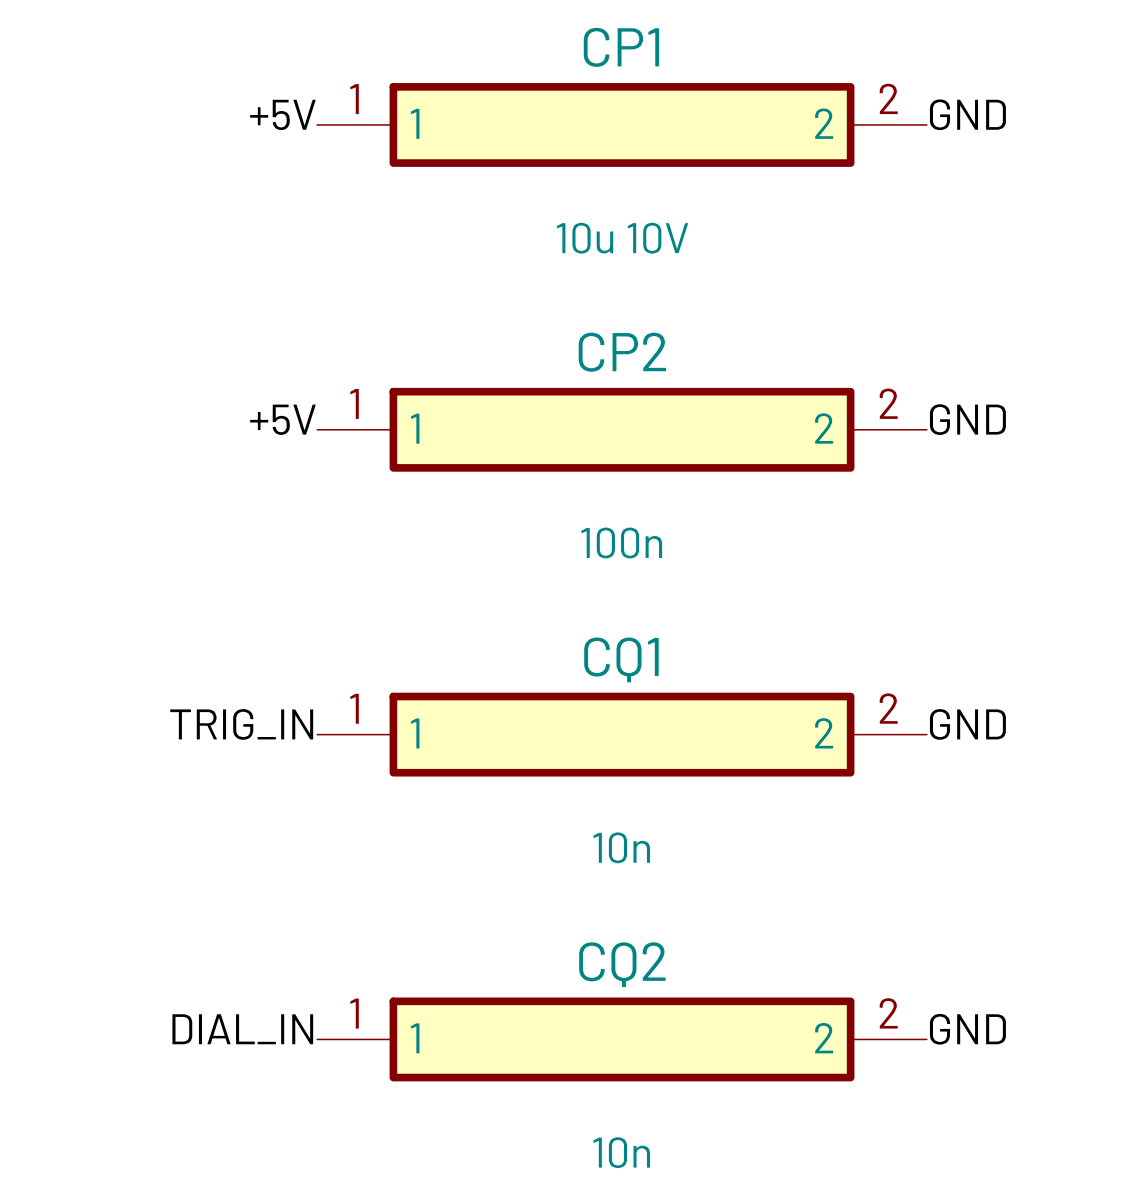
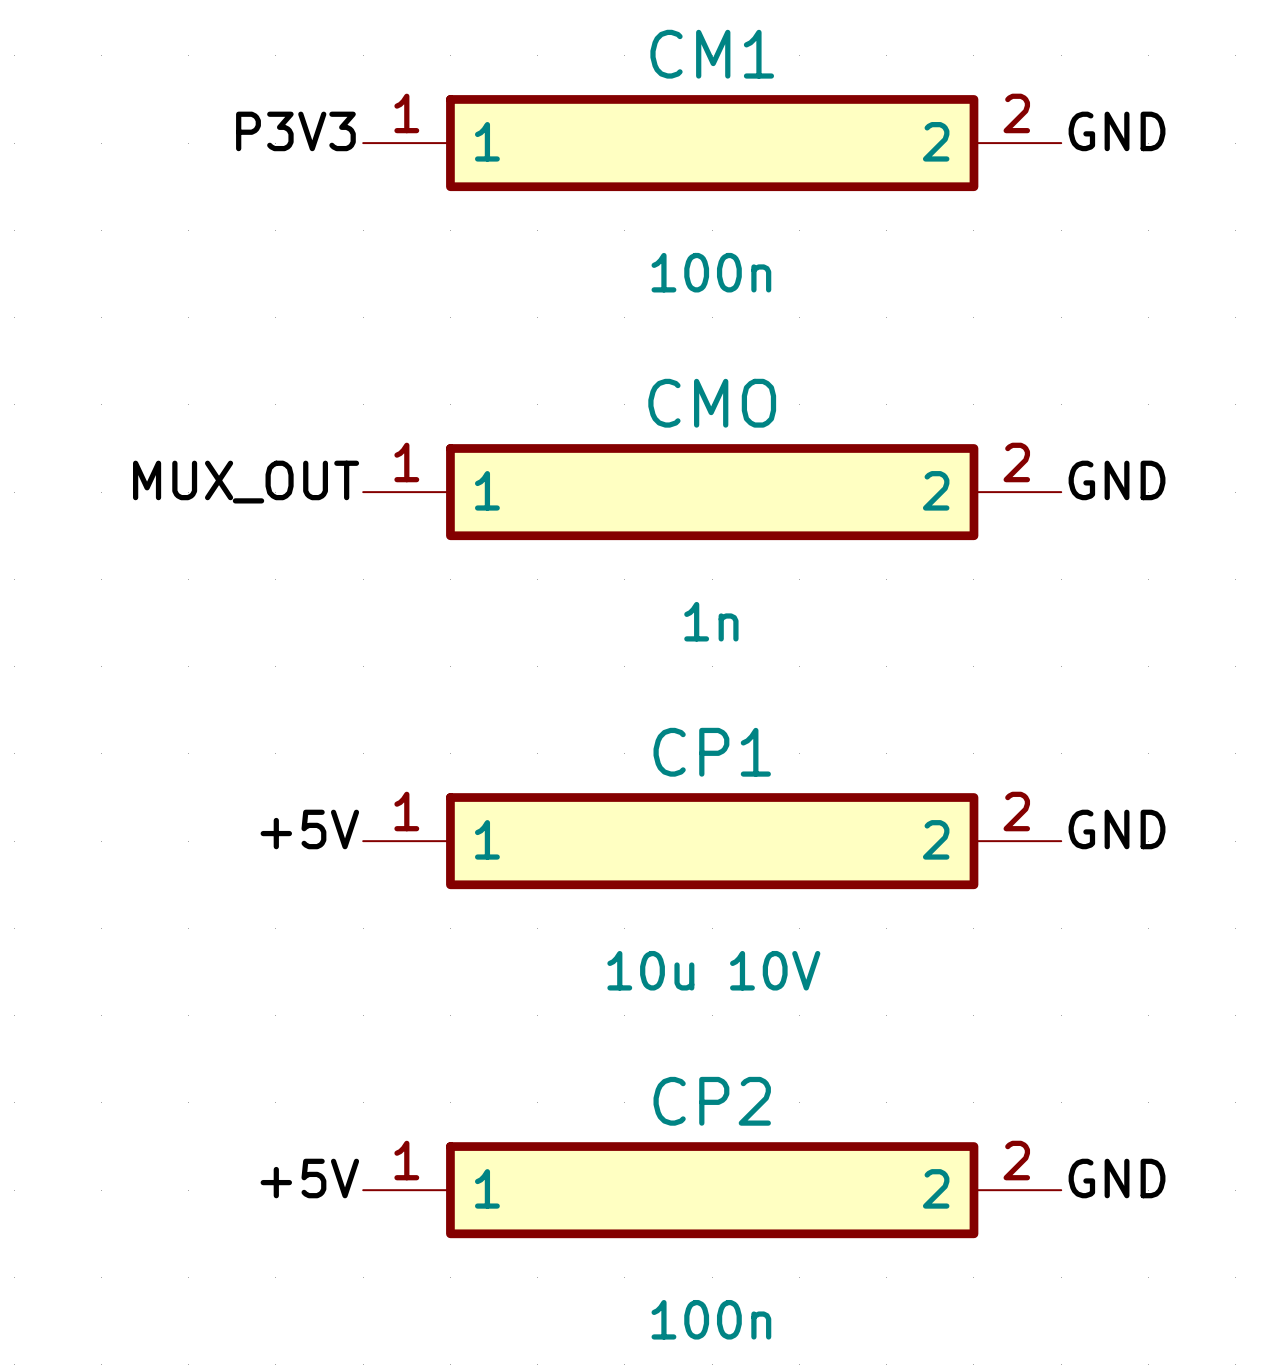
CP1 name: CP1 (621, 47) -> CM1 (712, 54)
label: +5V (282, 114) -> P3V3 (295, 131)
CP1 value: 10u 10V (622, 238) -> 100n (711, 272)
CP2 name: CP2 (622, 352) -> CMO (712, 403)
label: +5V (282, 419) -> MUX_OUT (246, 482)
CP2 value: 100n (621, 543) -> 1n (711, 621)
CQ1 name: CQ1 (621, 659) -> CP1 (712, 752)
label: TRIG_IN (241, 724) -> +5V (309, 829)
CQ1 value: 10n (621, 847) -> 10u 10V (713, 970)
CQ2 name: CQ2 (622, 964) -> CP2 (712, 1101)
label: DIAL_IN (242, 1029) -> +5V (309, 1178)
CQ2 value: 10n (621, 1152) -> 100n (711, 1319)

